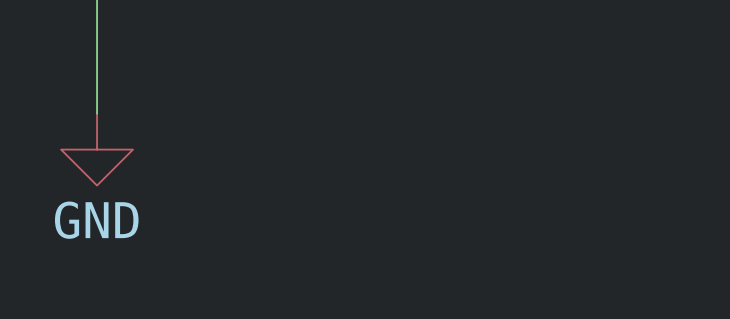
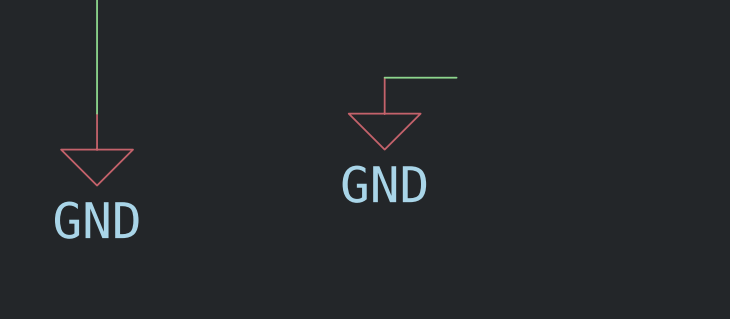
wire: none -> (384, 77) (456, 77)
power symbol: none -> GND (384, 113)

